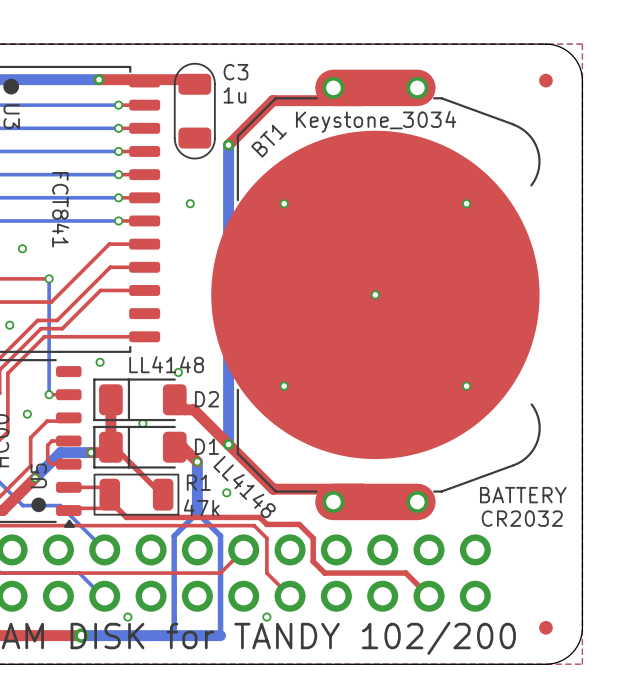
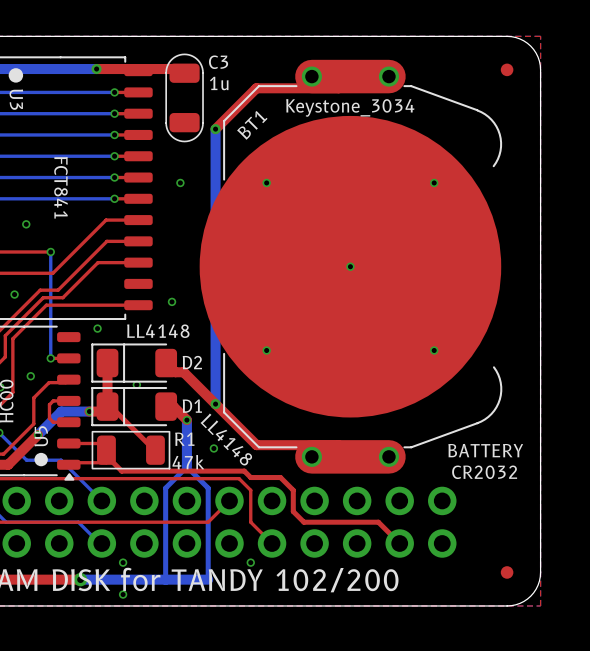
via position: (178, 372) -> (172, 301)
via: none -> (123, 594)

